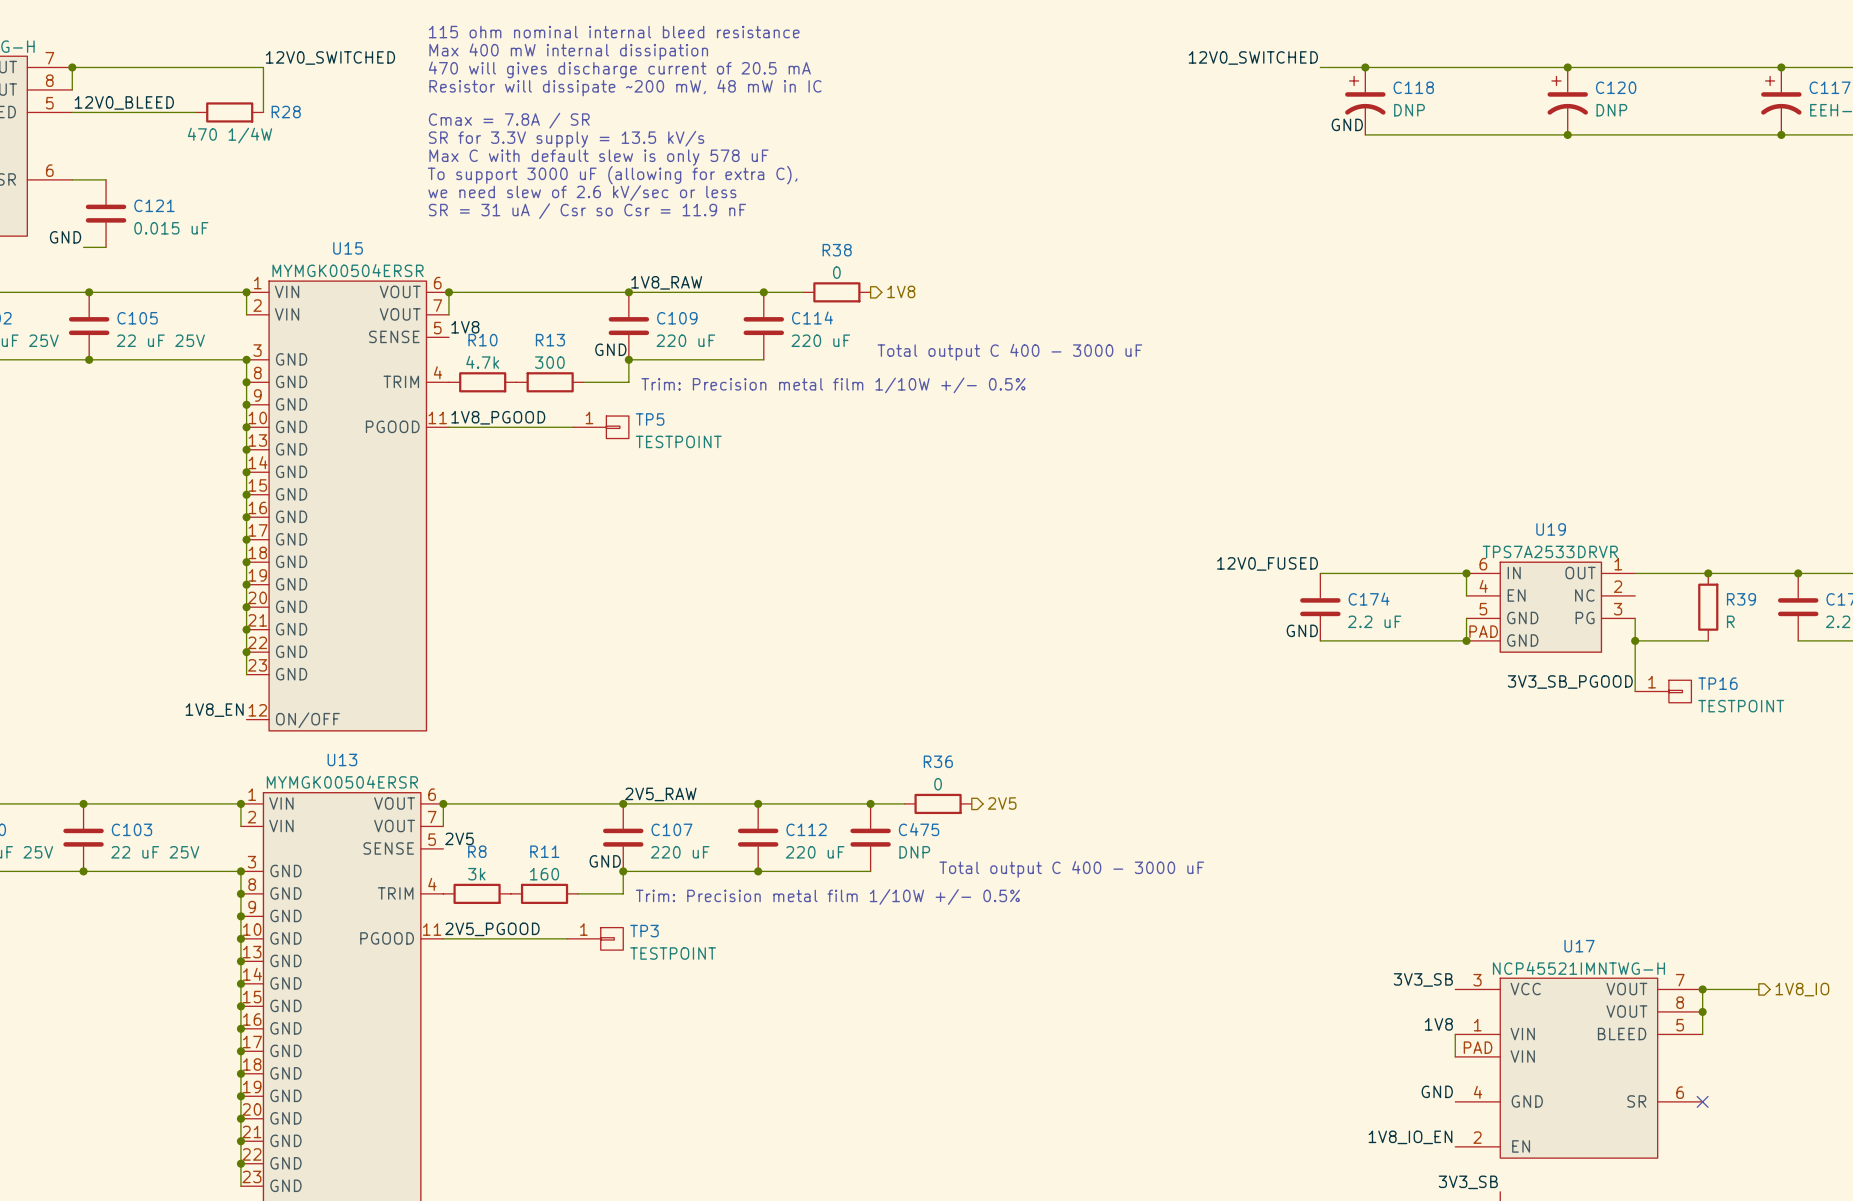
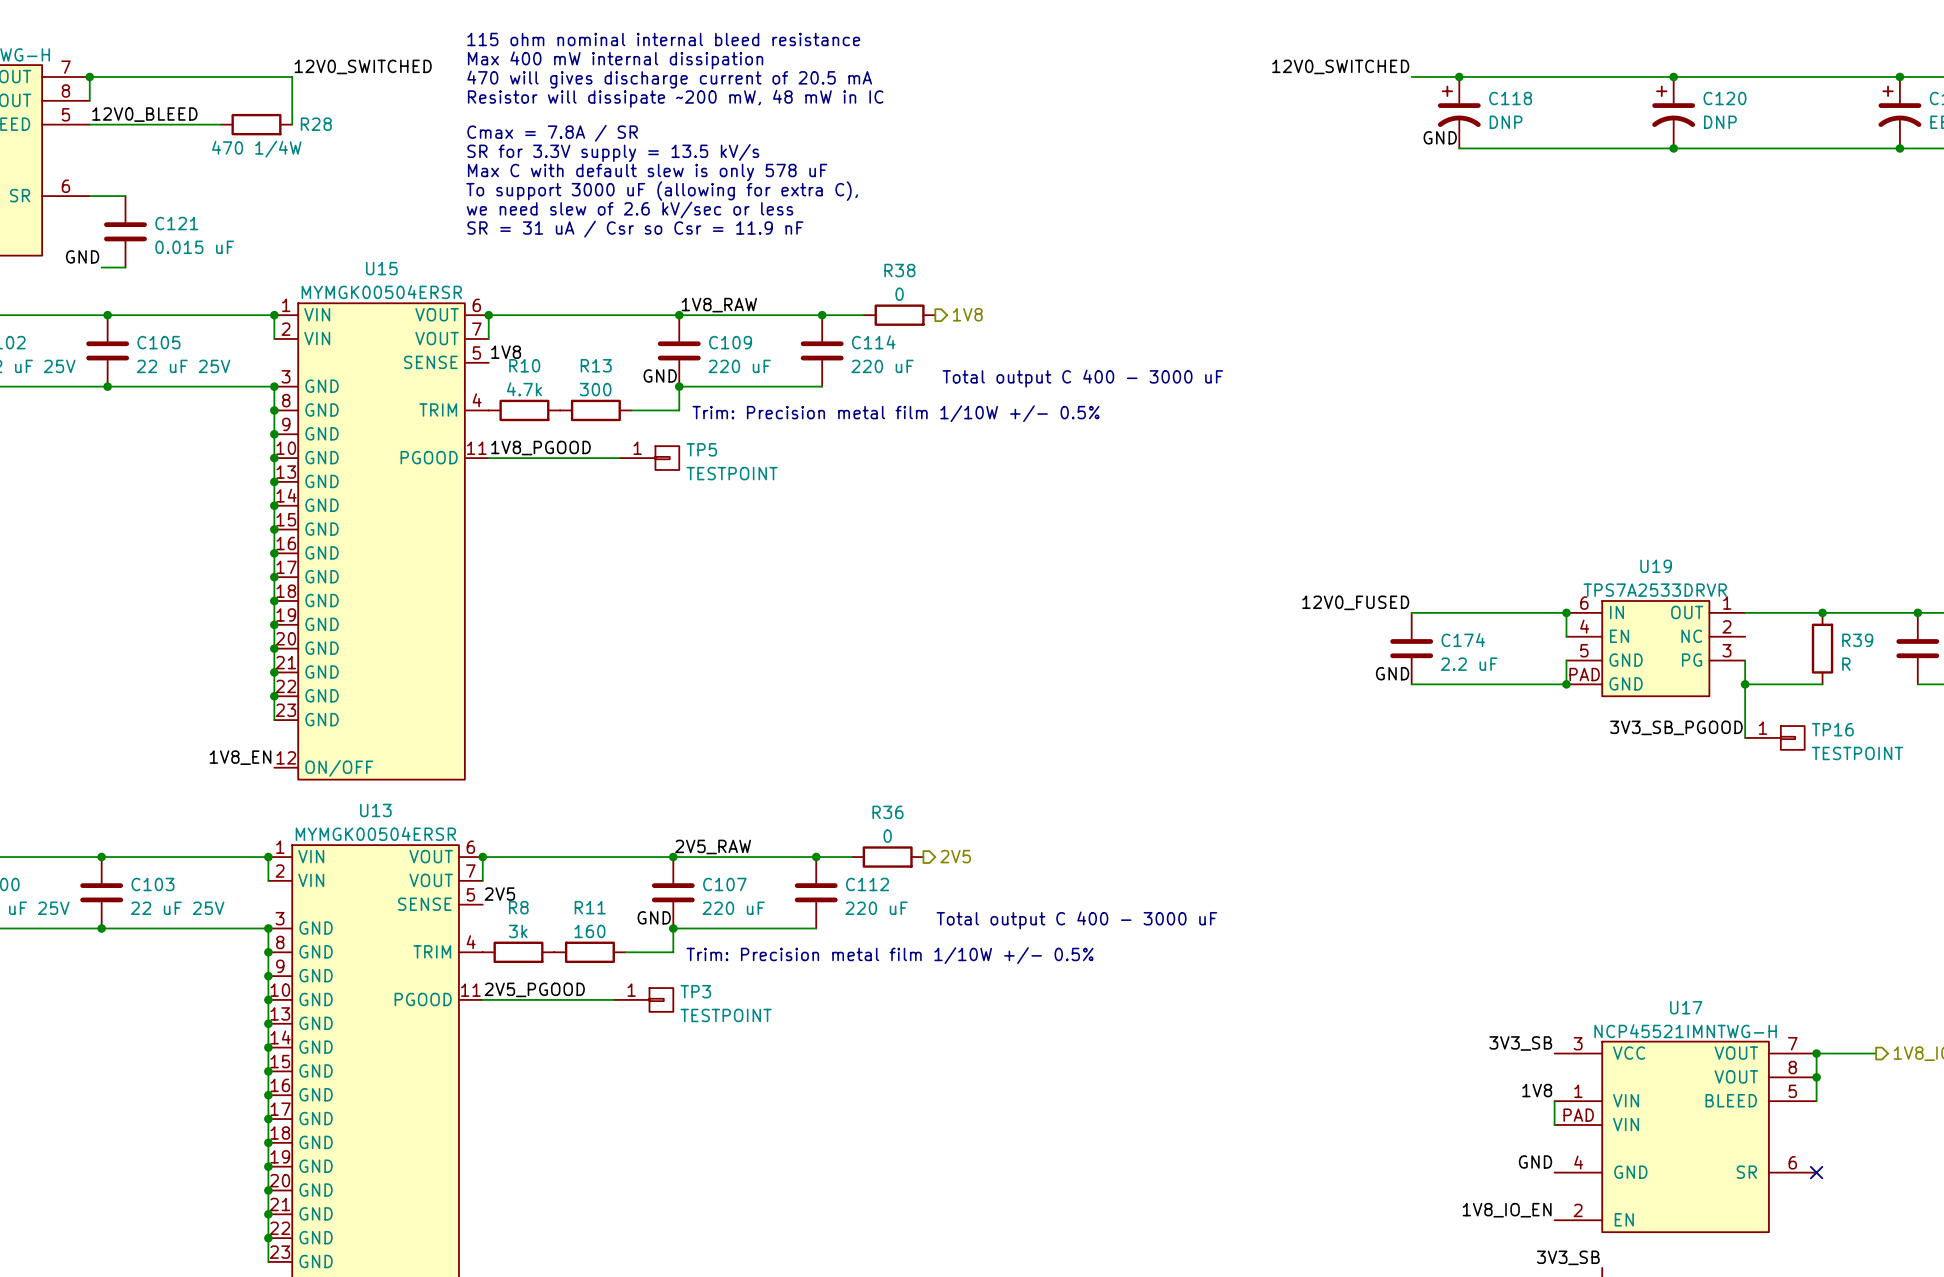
wire: (791, 803) (904, 803) -> none
junction: (870, 803) -> none
R36 position: (938, 803) -> (887, 857)
hierarchical label position: 2V5 (1002, 803) -> 2V5 (955, 856)
C475: DNP (870, 837) -> none
text position: Total output C 400 - 3000 uF (1071, 869) -> Total output C 400 - 3000 uF (1076, 920)
wire: (758, 871) (870, 871) -> none
junction: (758, 871) -> none

